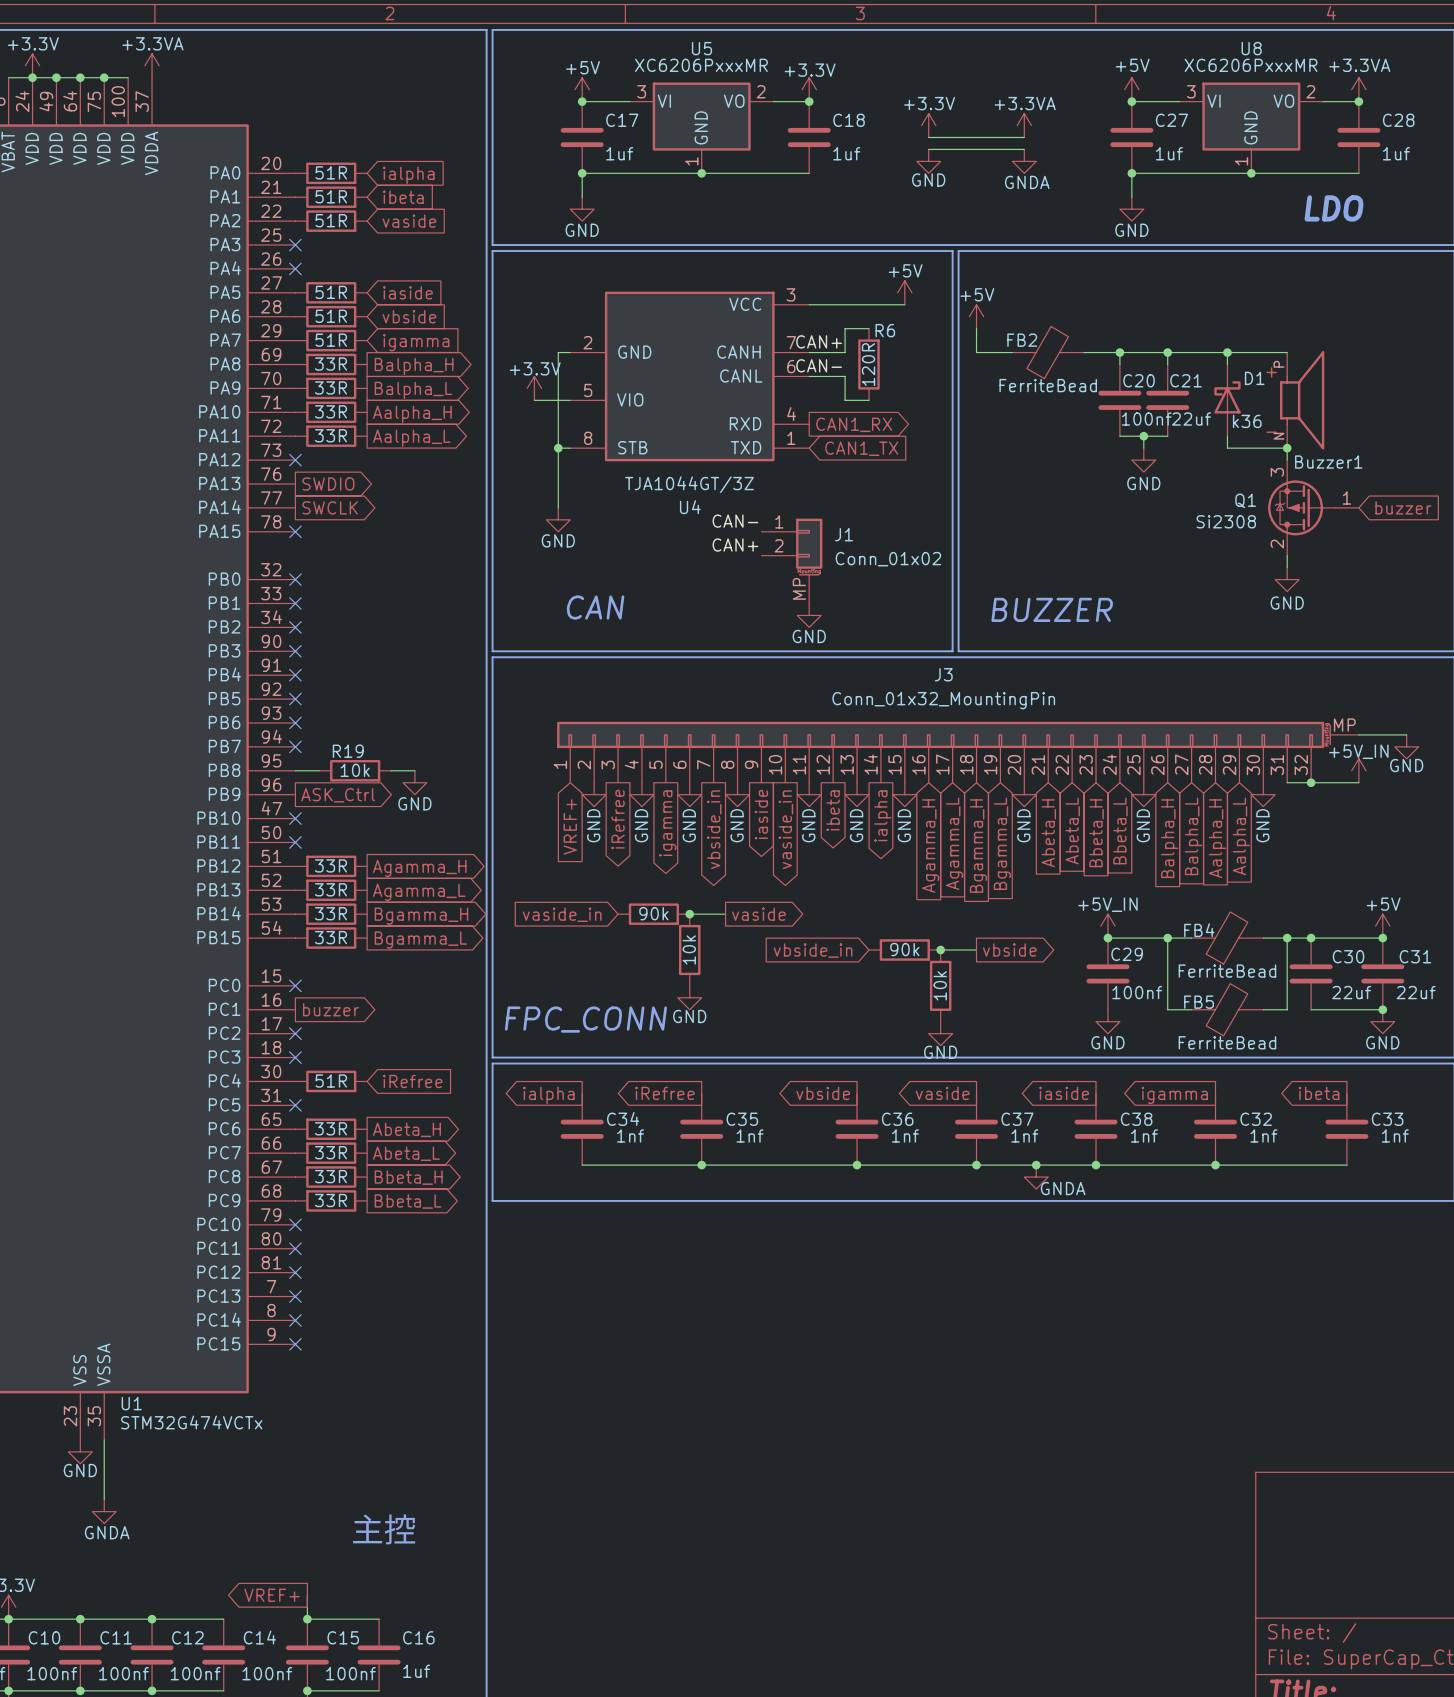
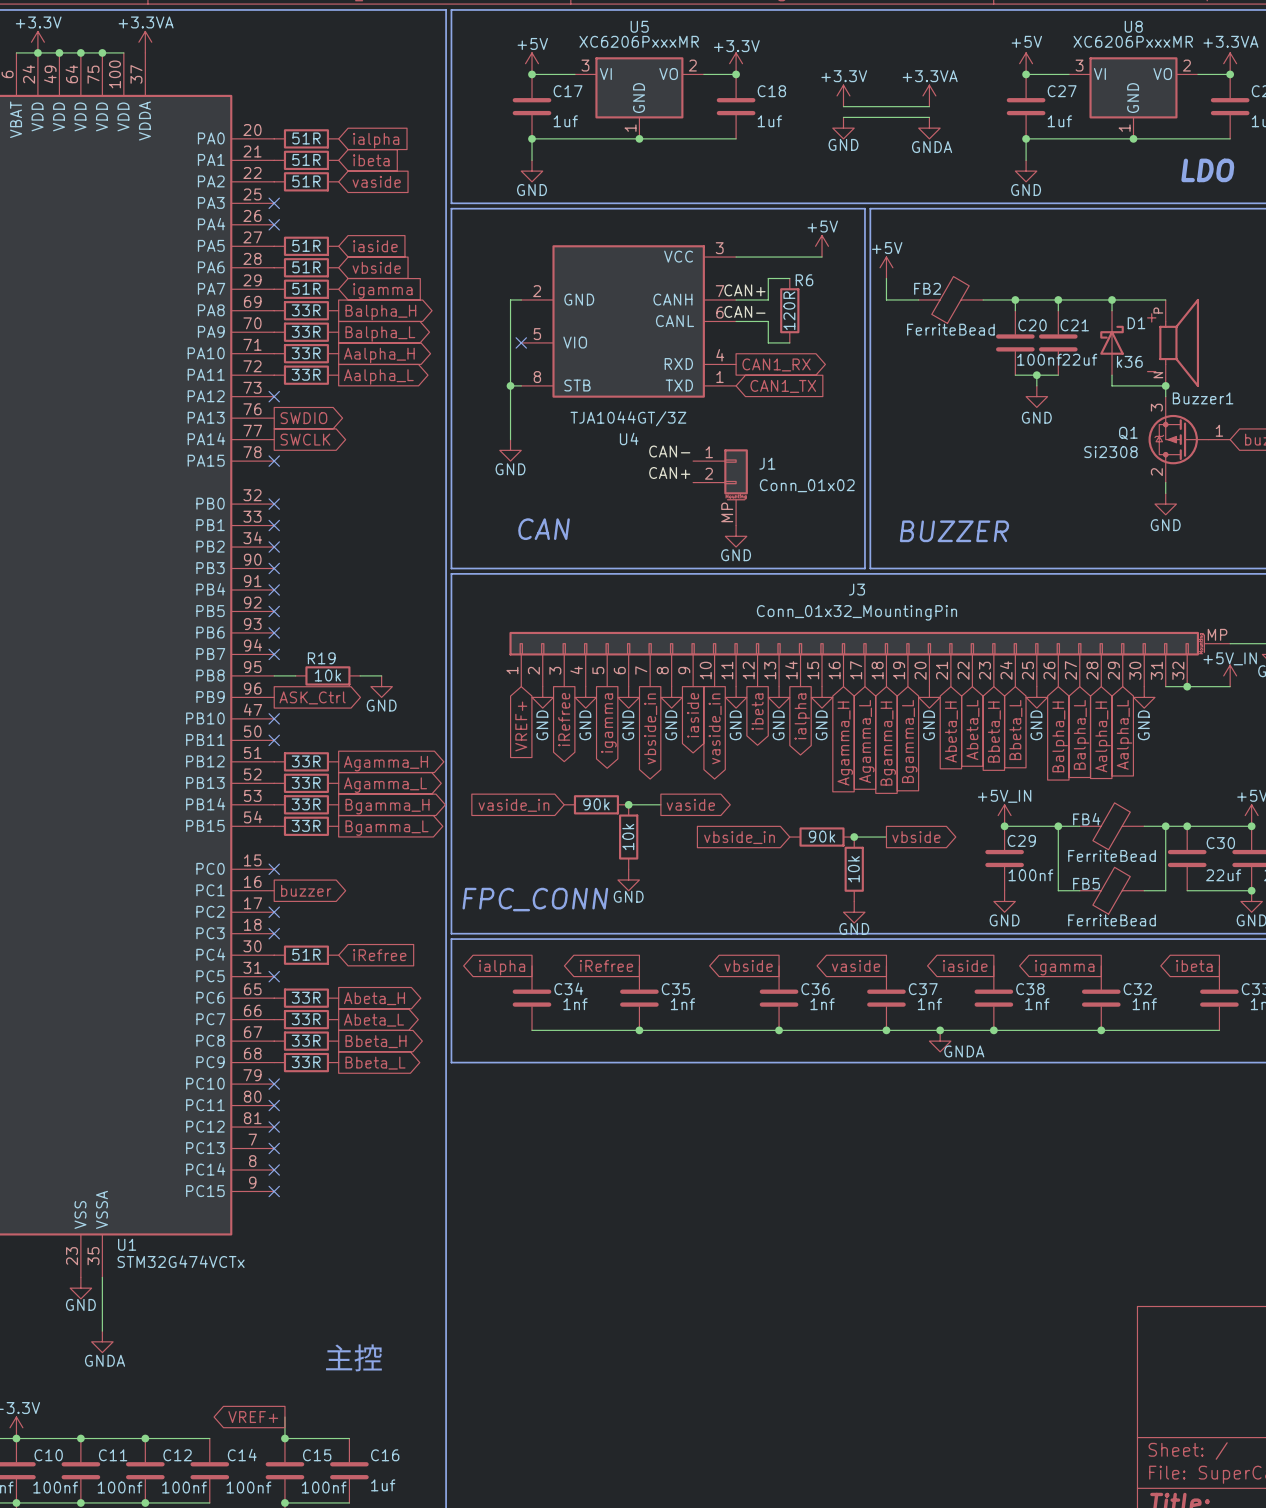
power symbol: +3.3V (534, 388) -> none
wire: (534, 400) (570, 400) -> none
no-connect mark: none -> (521, 342)

